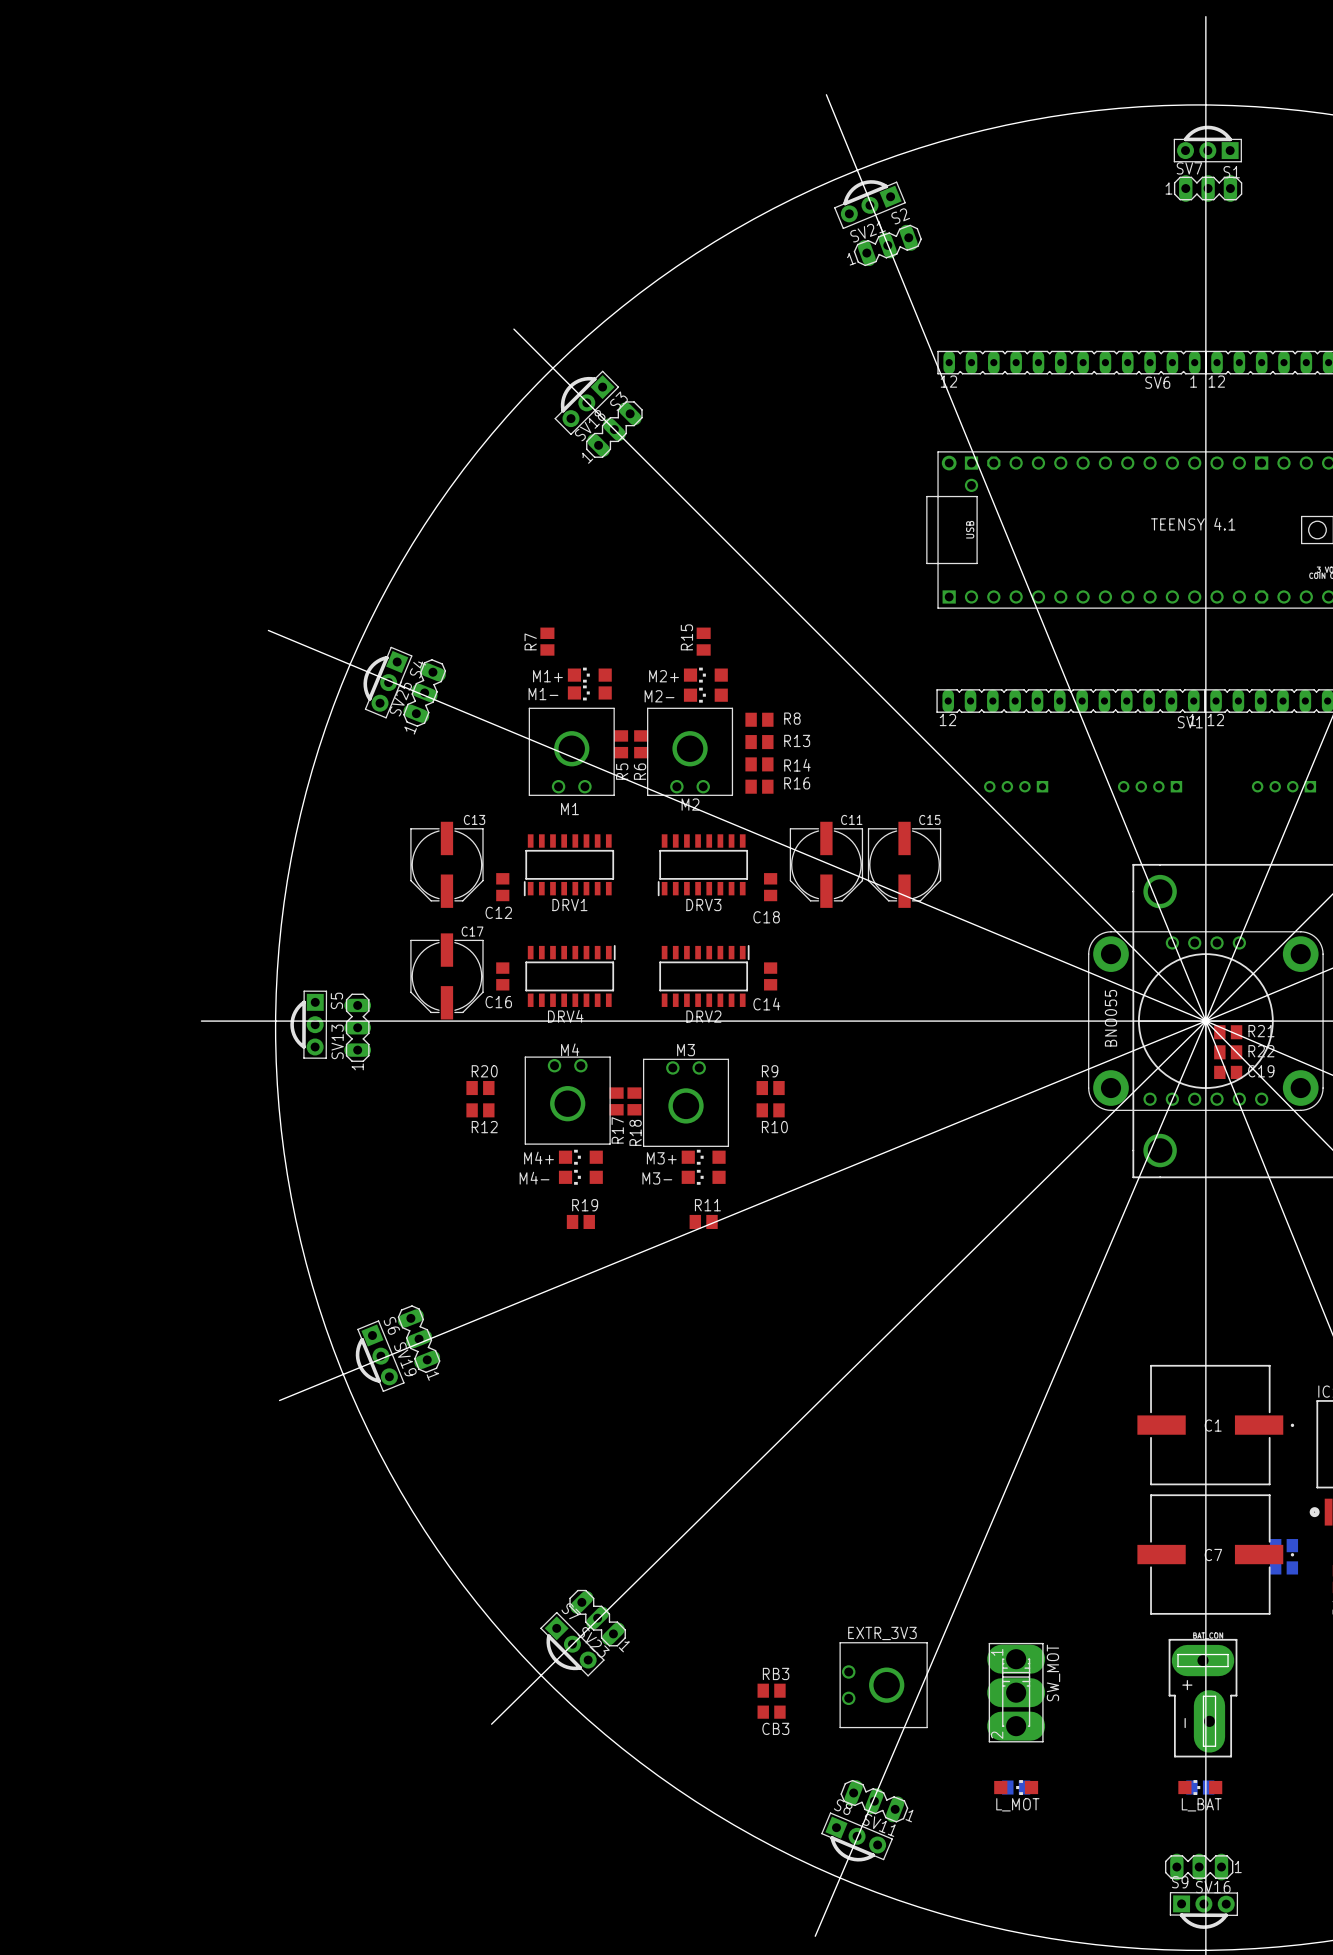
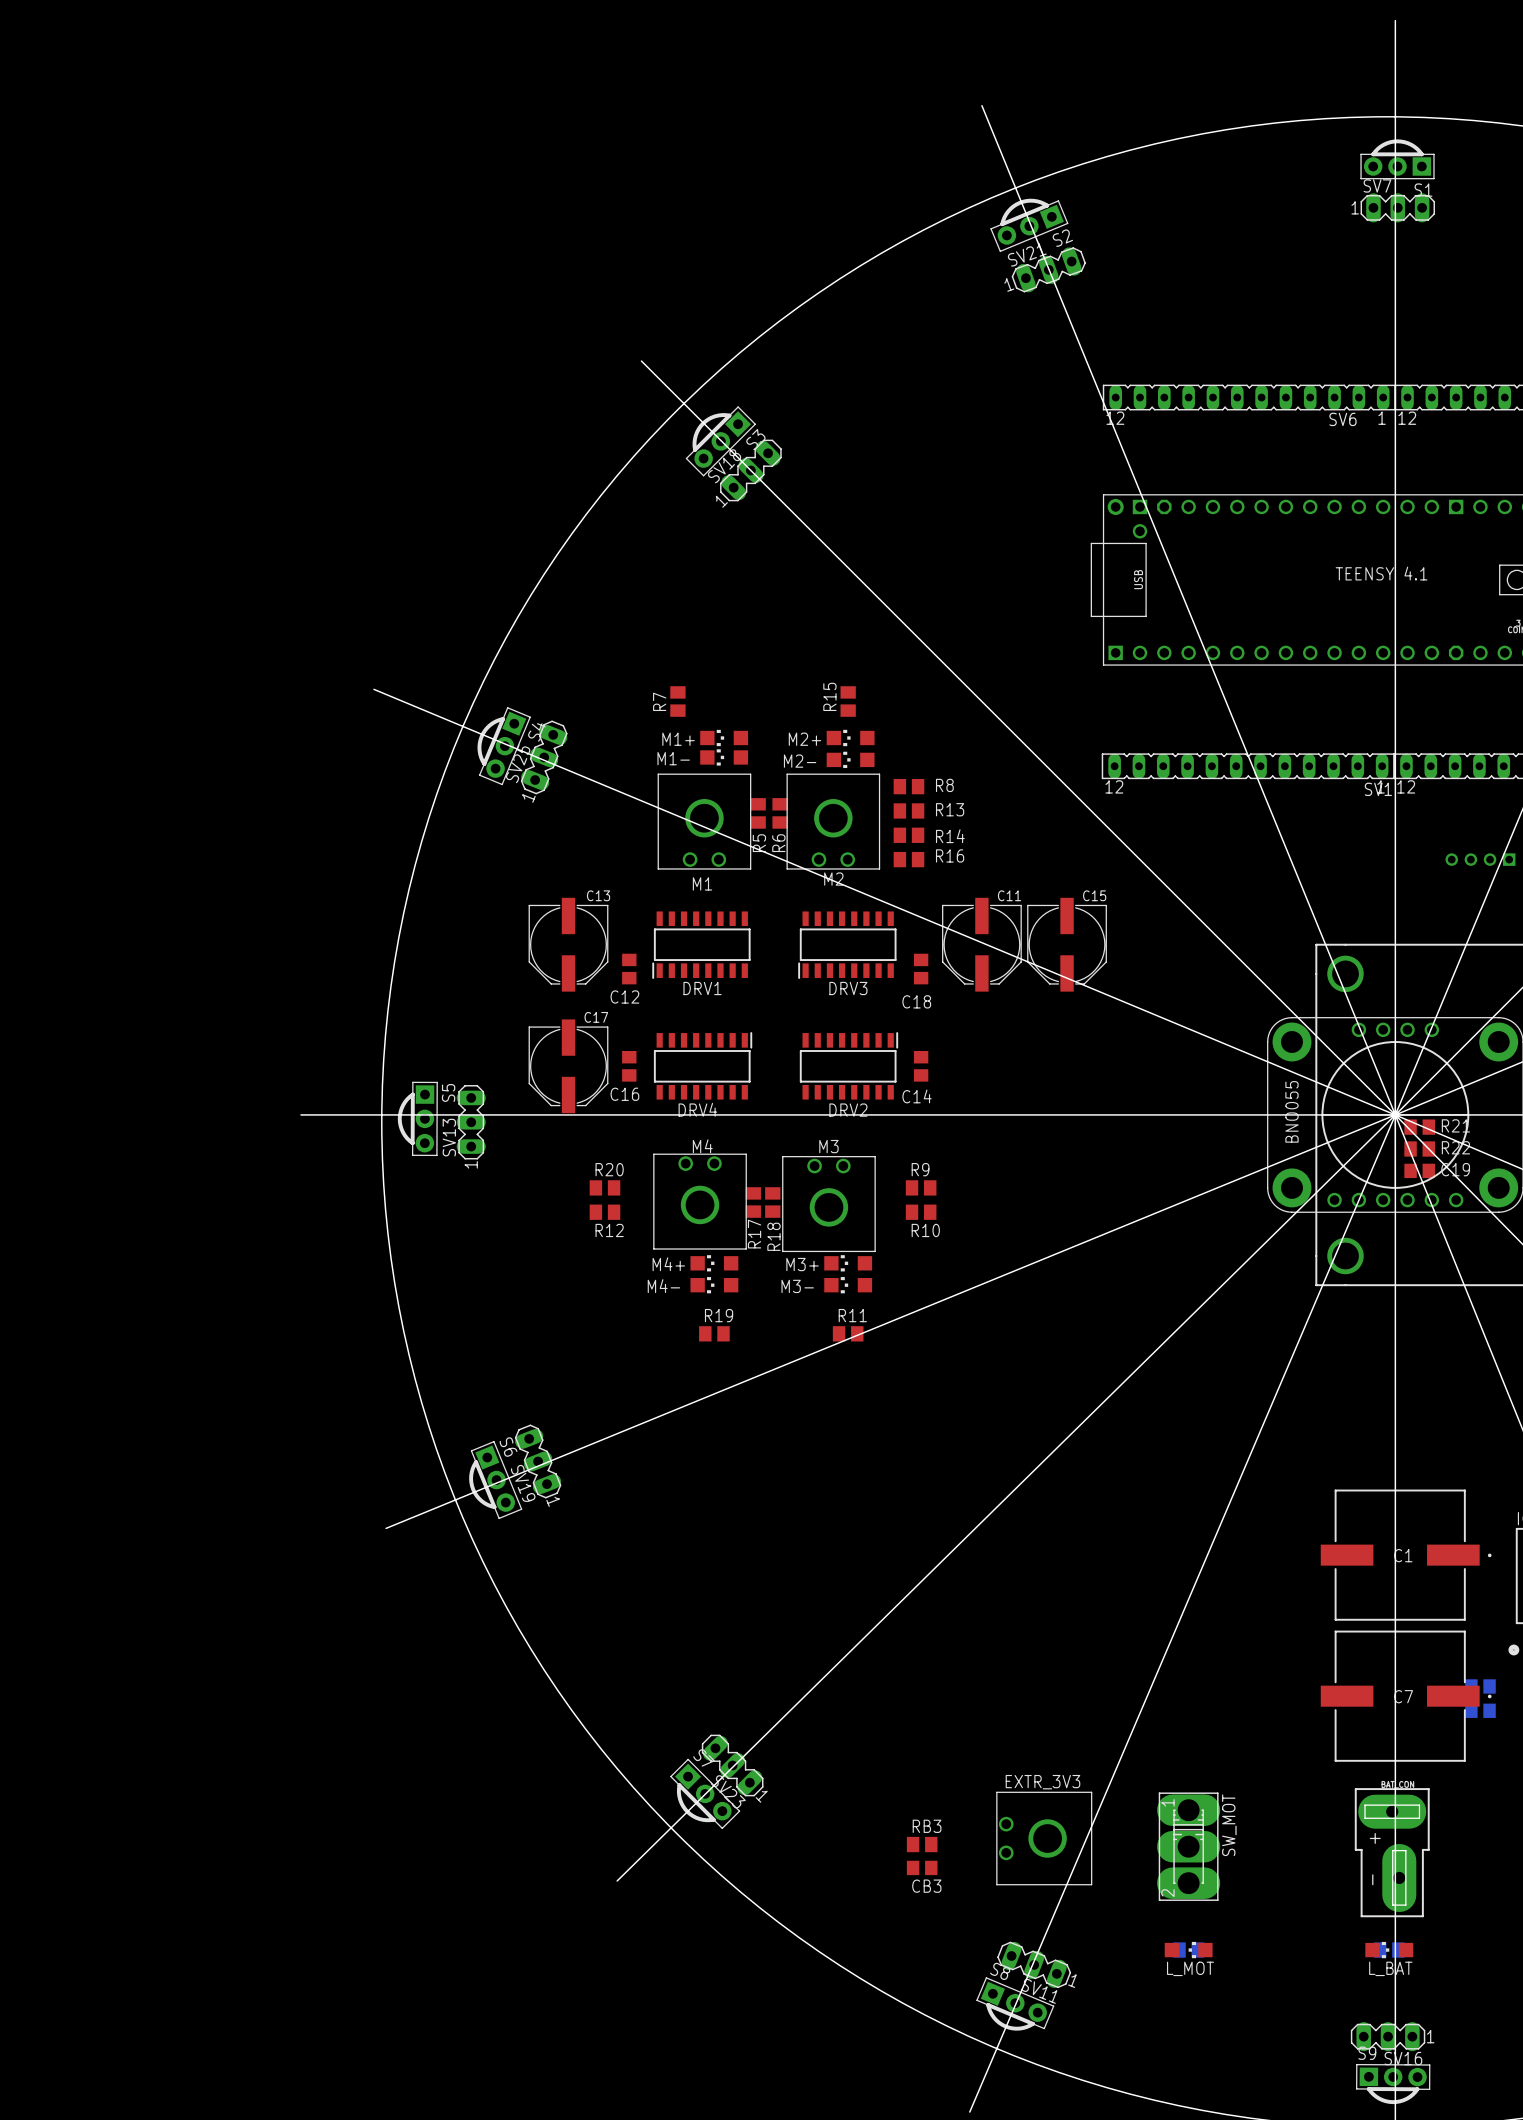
part: (1016, 786) -> none
part: (1150, 786) -> none

